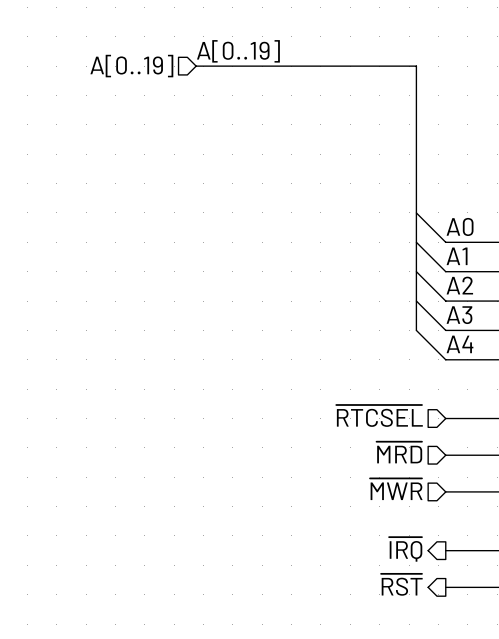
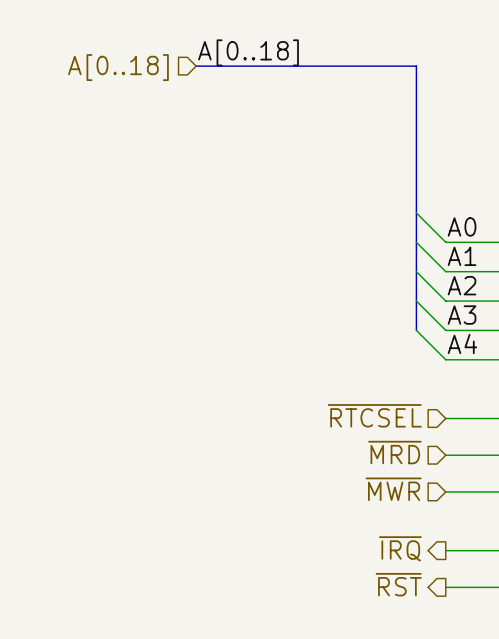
label: A[0..19] (238, 51) -> A[0..18] (248, 52)
hierarchical label: A[0..19] (131, 66) -> A[0..18] (118, 67)

